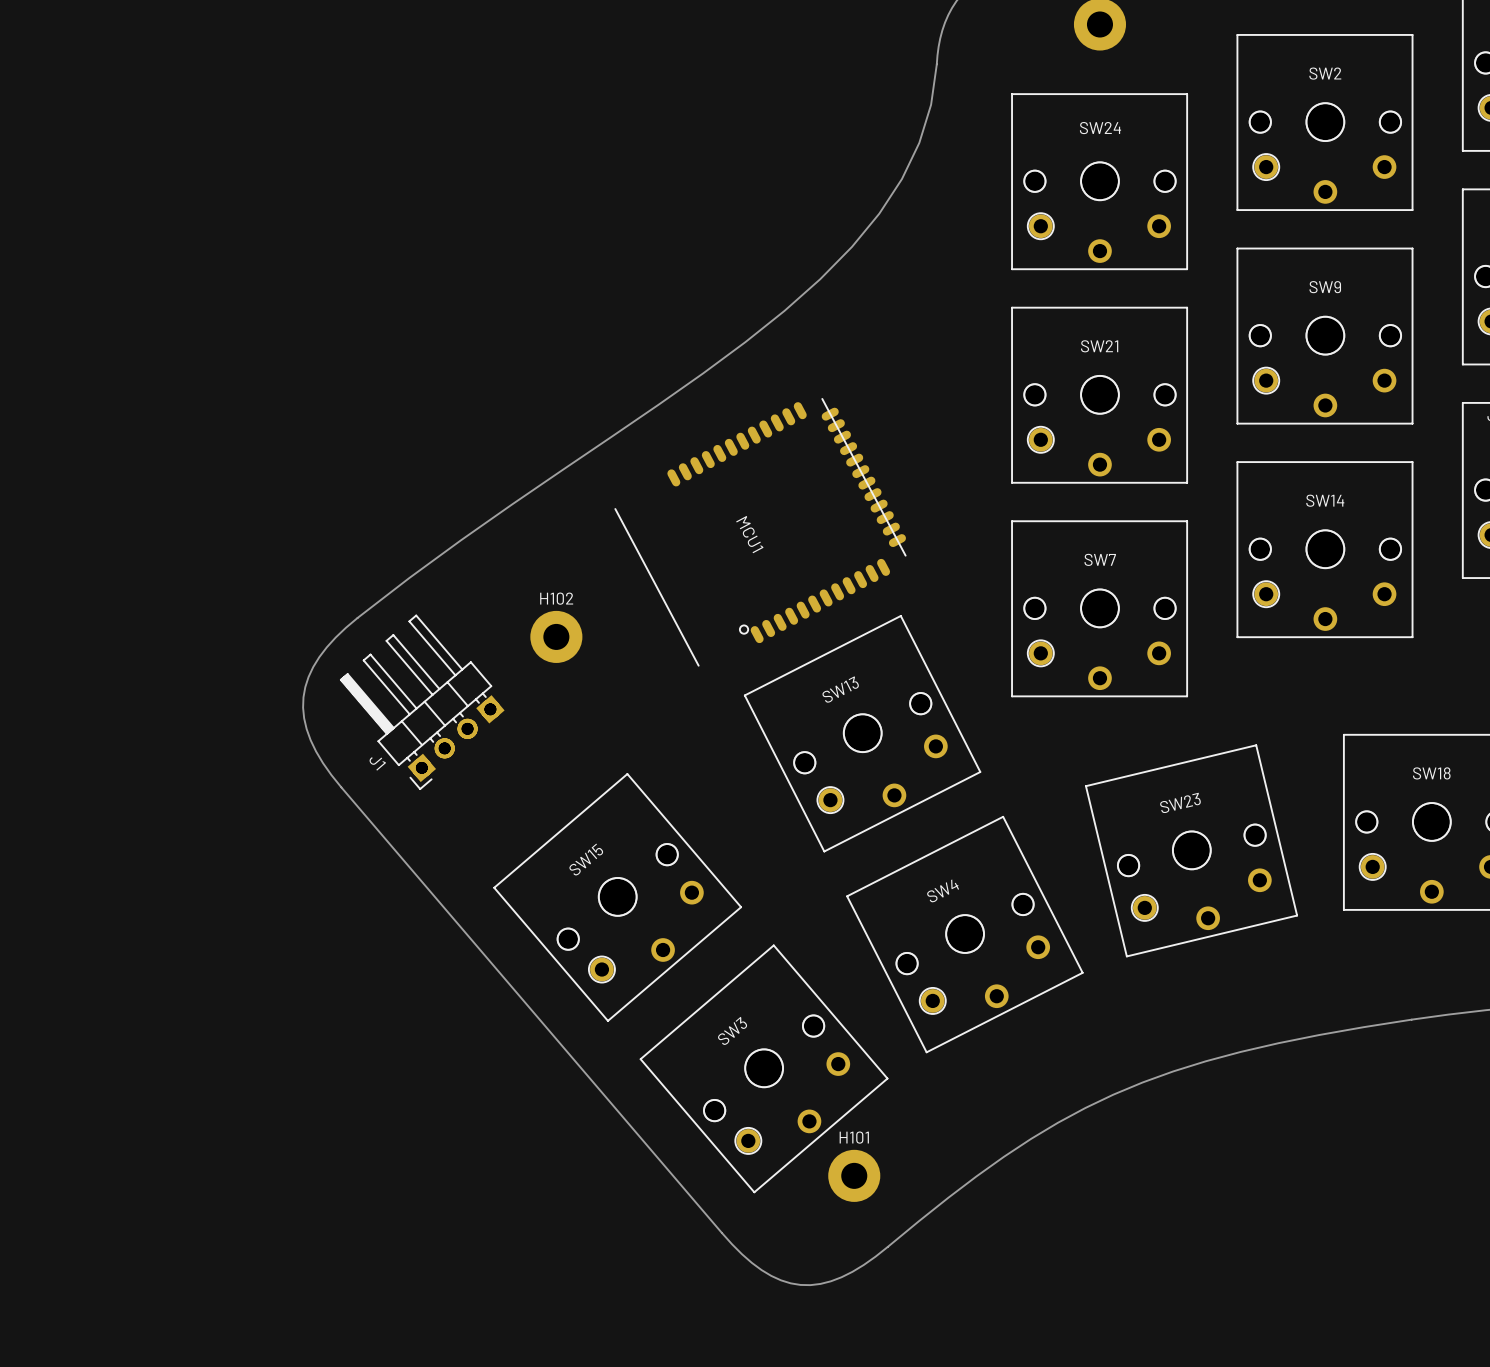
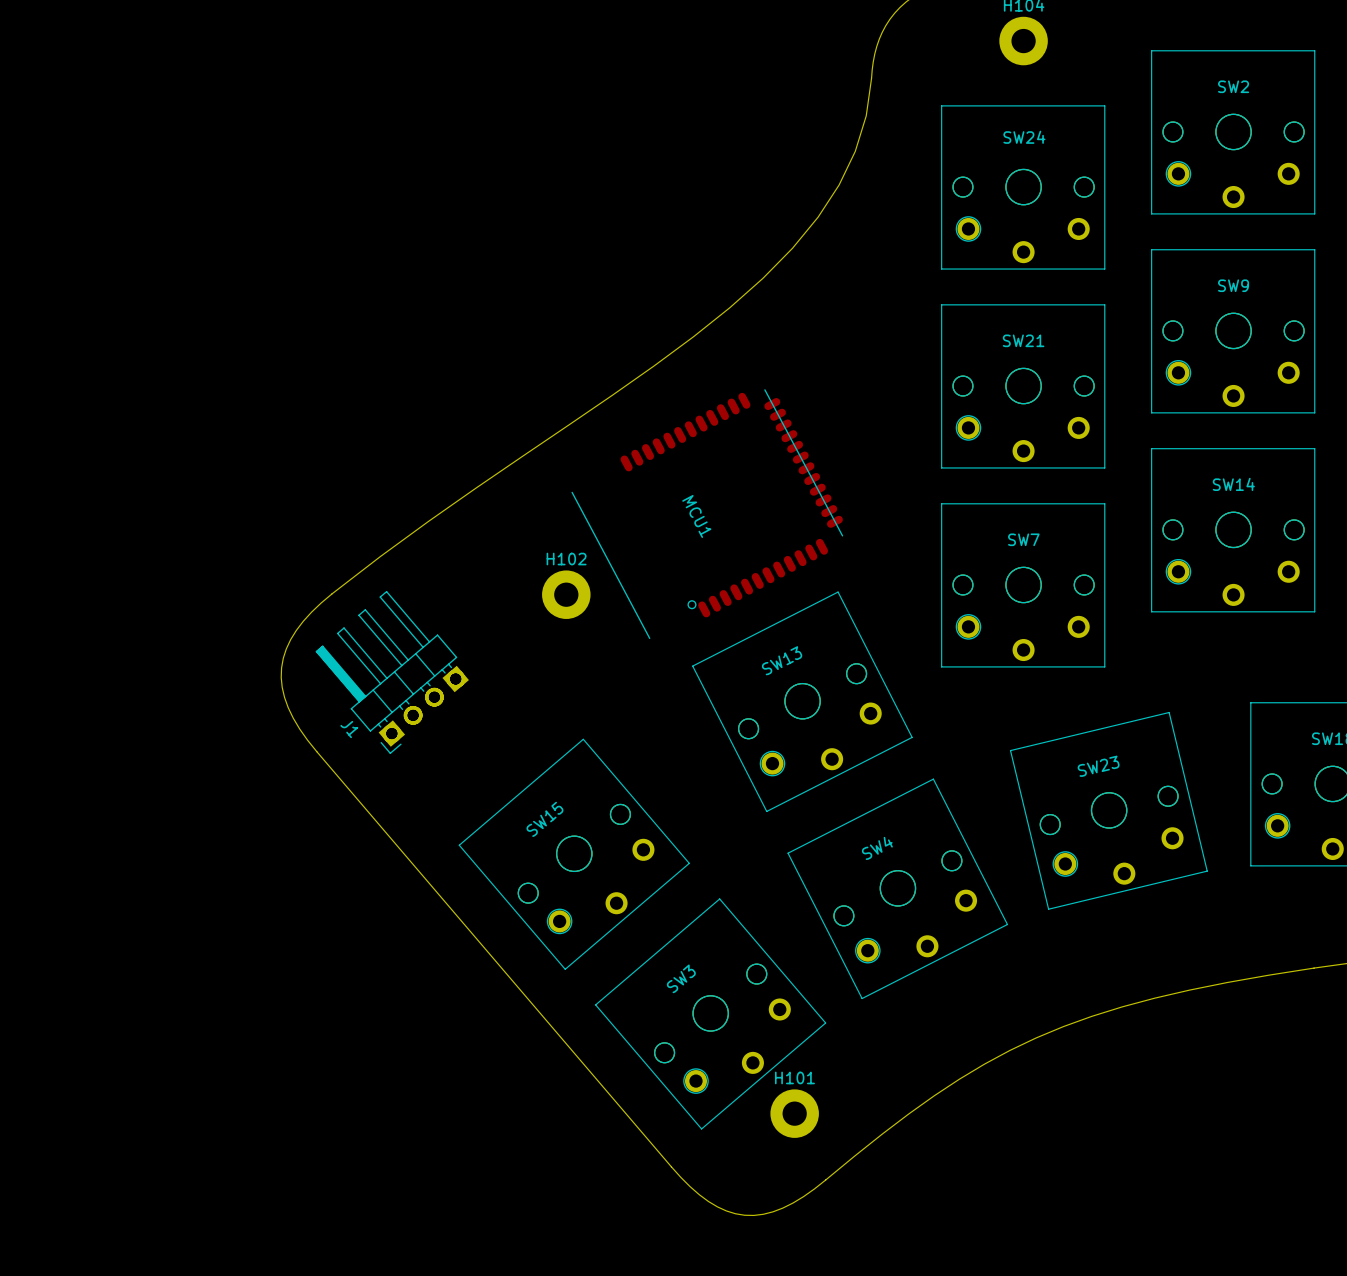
H102 position: (556, 636) -> (566, 594)

